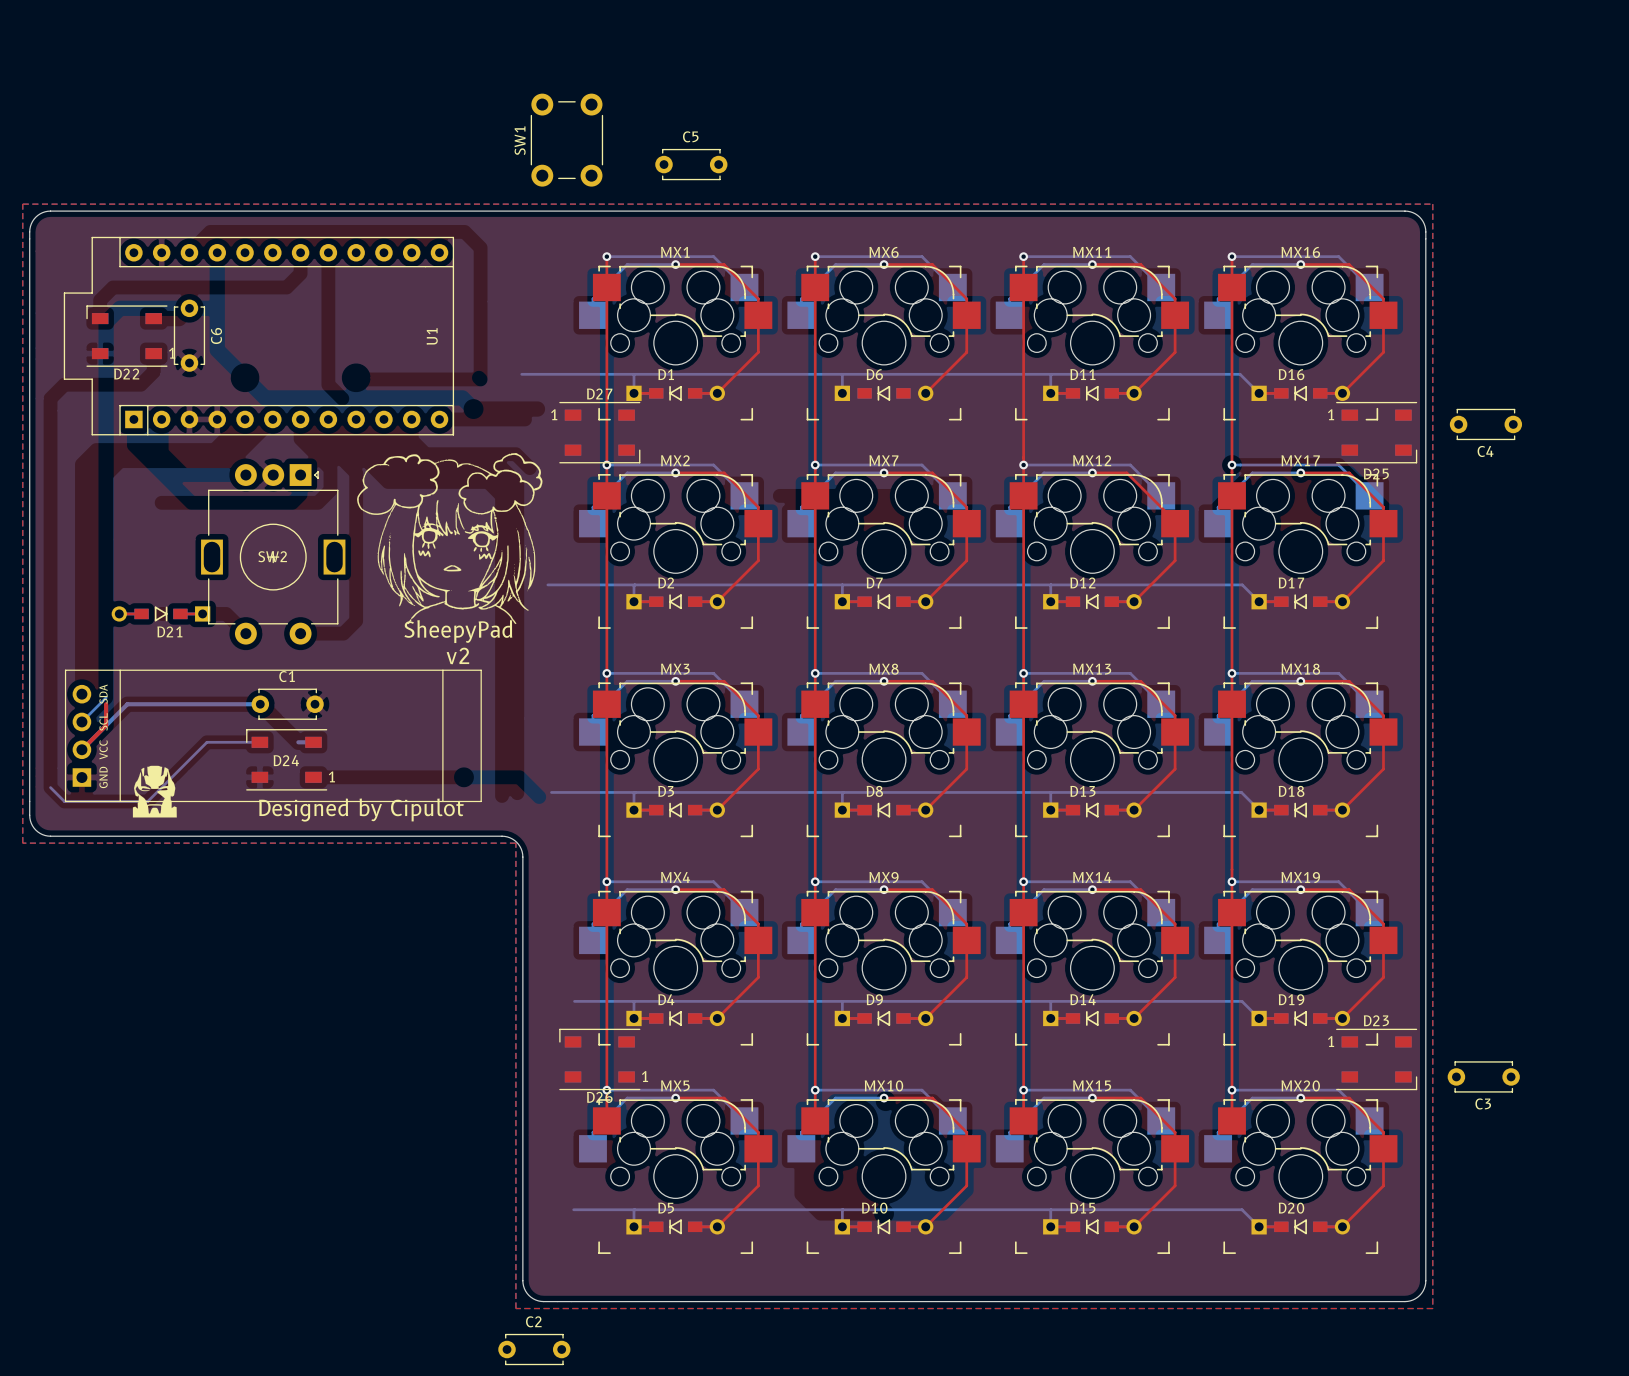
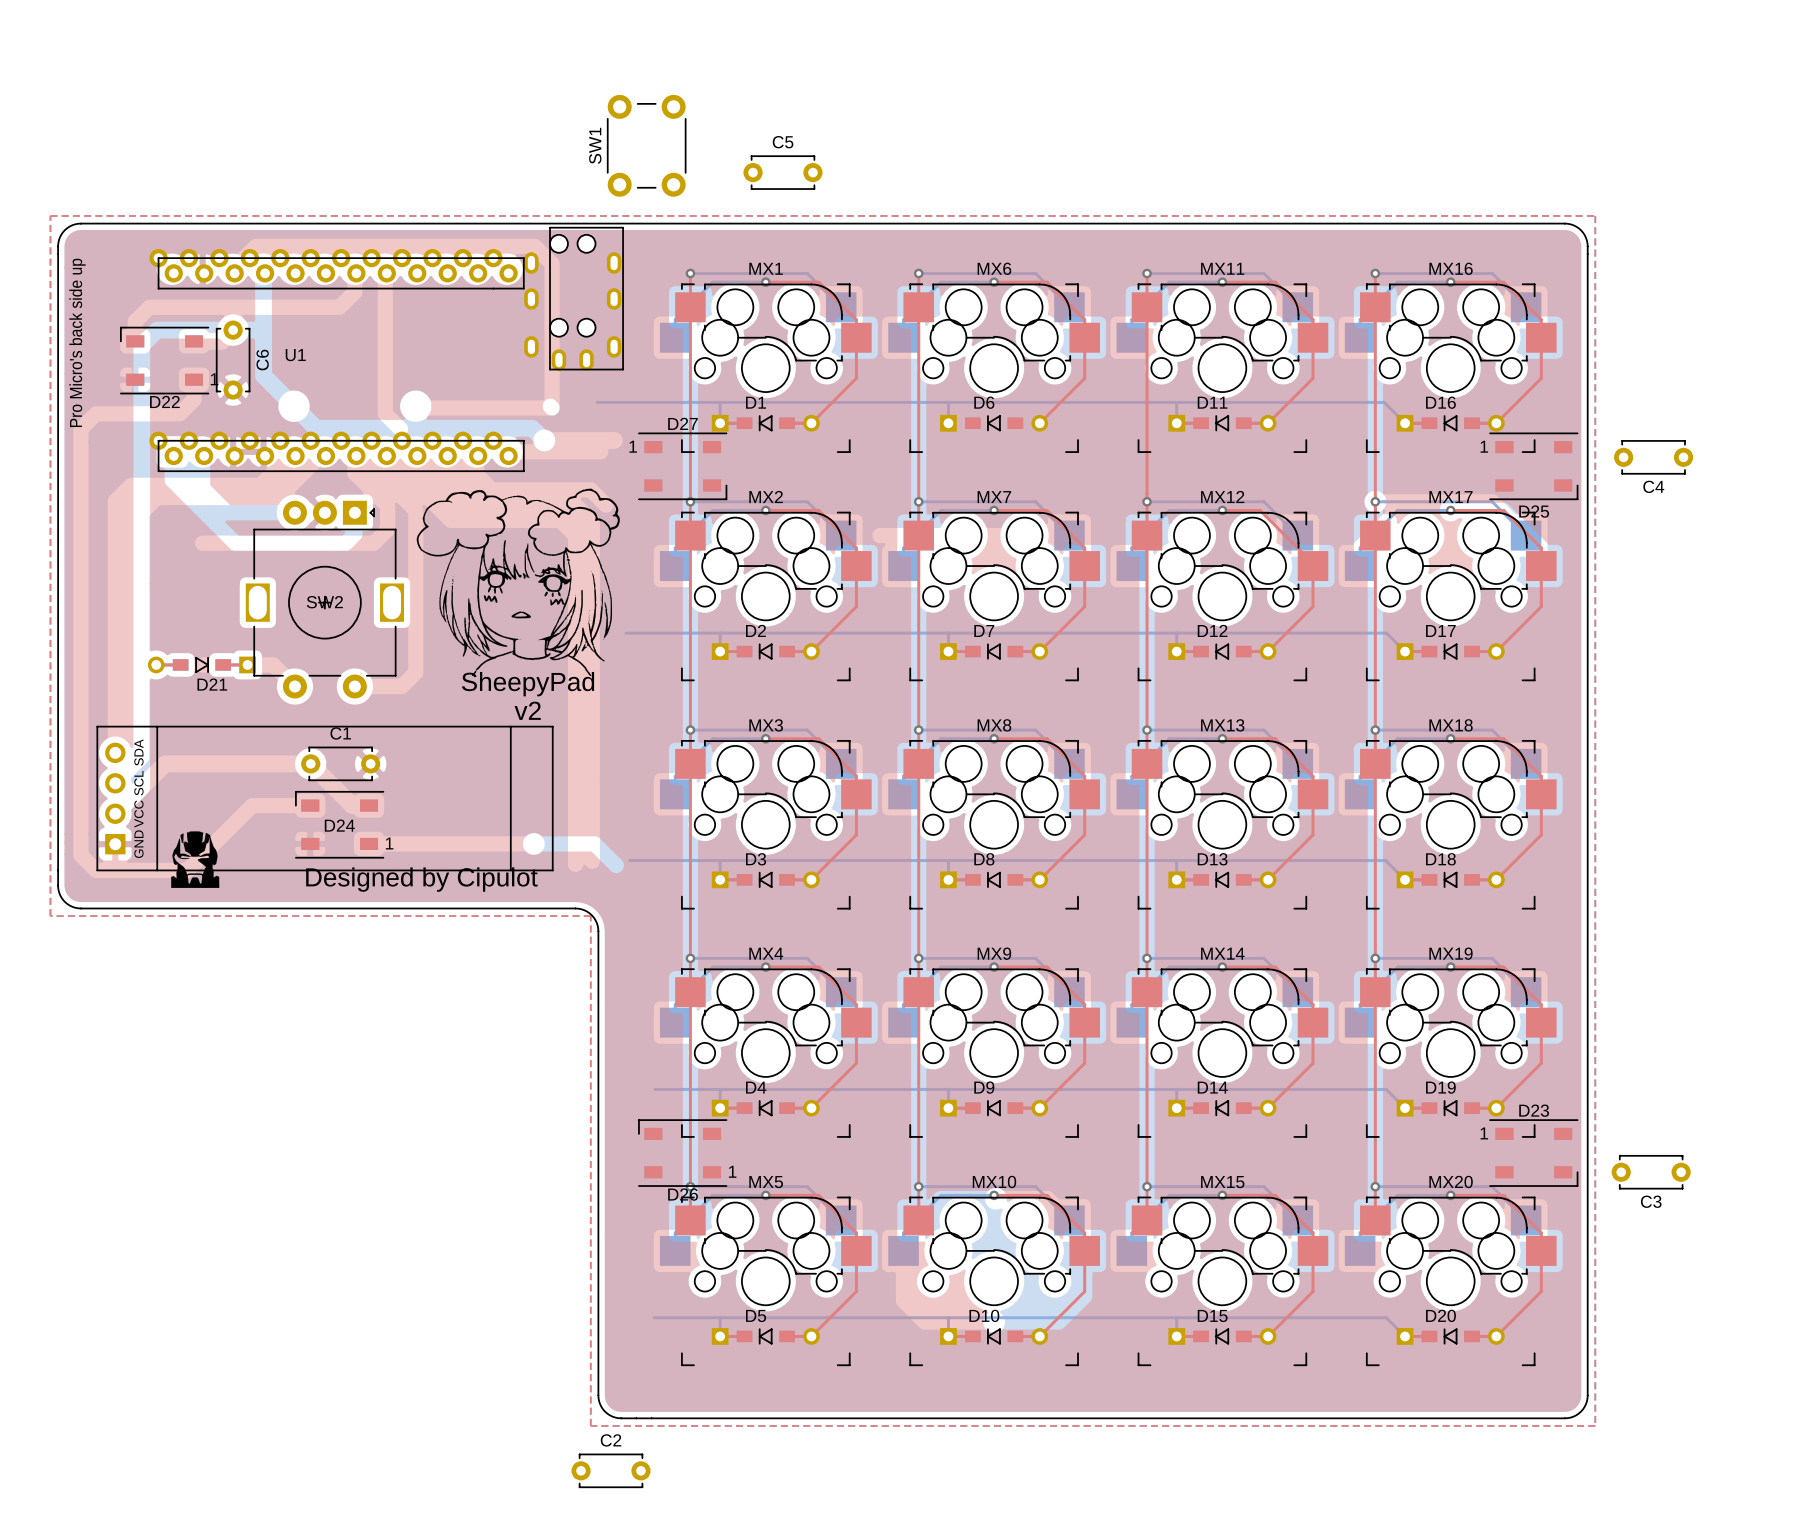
line: none -> (549, 227) (623, 227) (623, 369) (549, 369) (549, 227)
U1 footprint: [63, 236, 455, 436] -> [149, 249, 525, 472]
part: none -> (558, 302)
part: none -> (586, 302)
text: none -> Pro Micro's back side up (77, 342)
U1 name position: U1 (432, 336) -> U1 (295, 355)
bottom track: (106, 697) (81, 721) -> none
top track: (106, 704) (106, 725) (81, 749) -> none
bottom track: (260, 704) (127, 704) (81, 749) -> none
bottom track: (259, 742) (206, 742) (147, 801) (64, 801) (50, 787) -> none
bottom track: (298, 742) (313, 742) -> none

